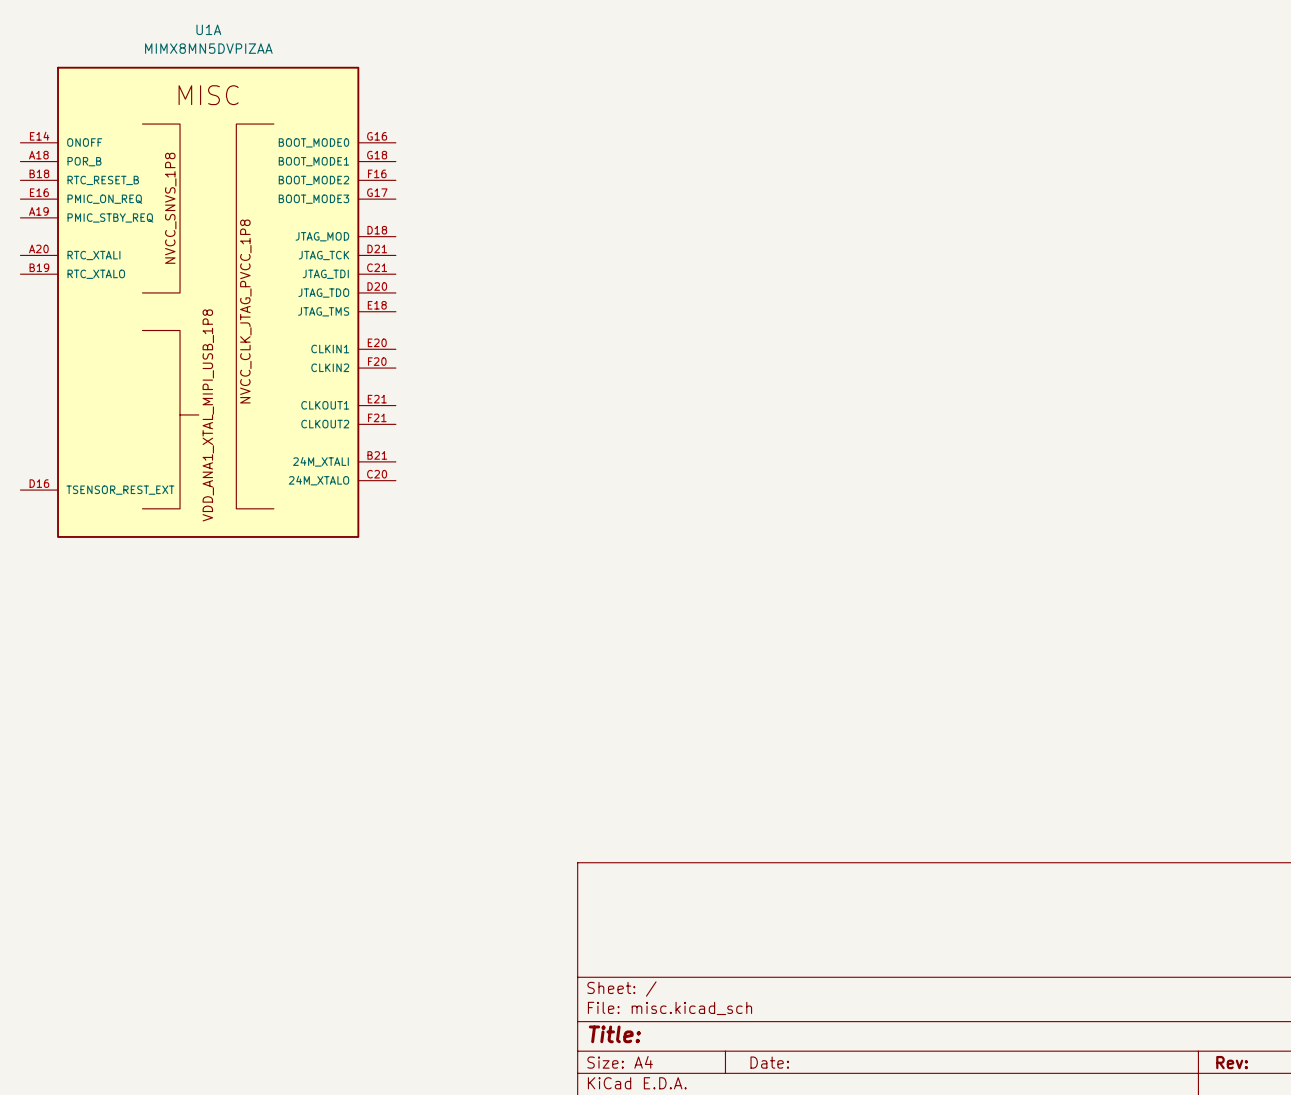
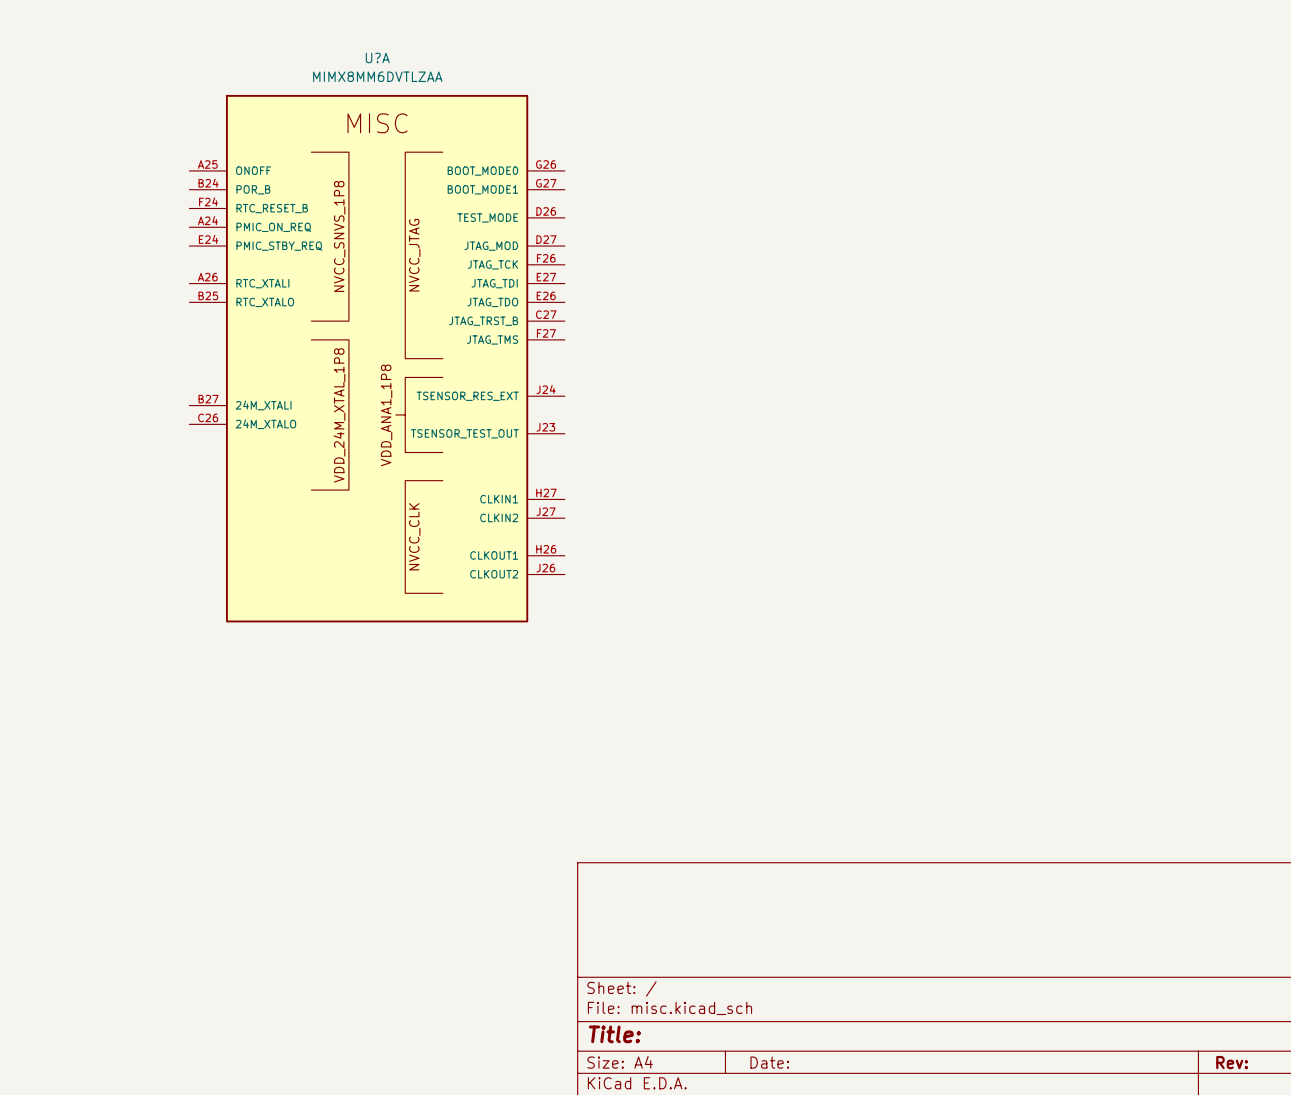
U1A: MIMX8MN5DVPIZAA (208, 302) -> none
U?A: none -> MIMX8MM6DVTLZAA (377, 358)

